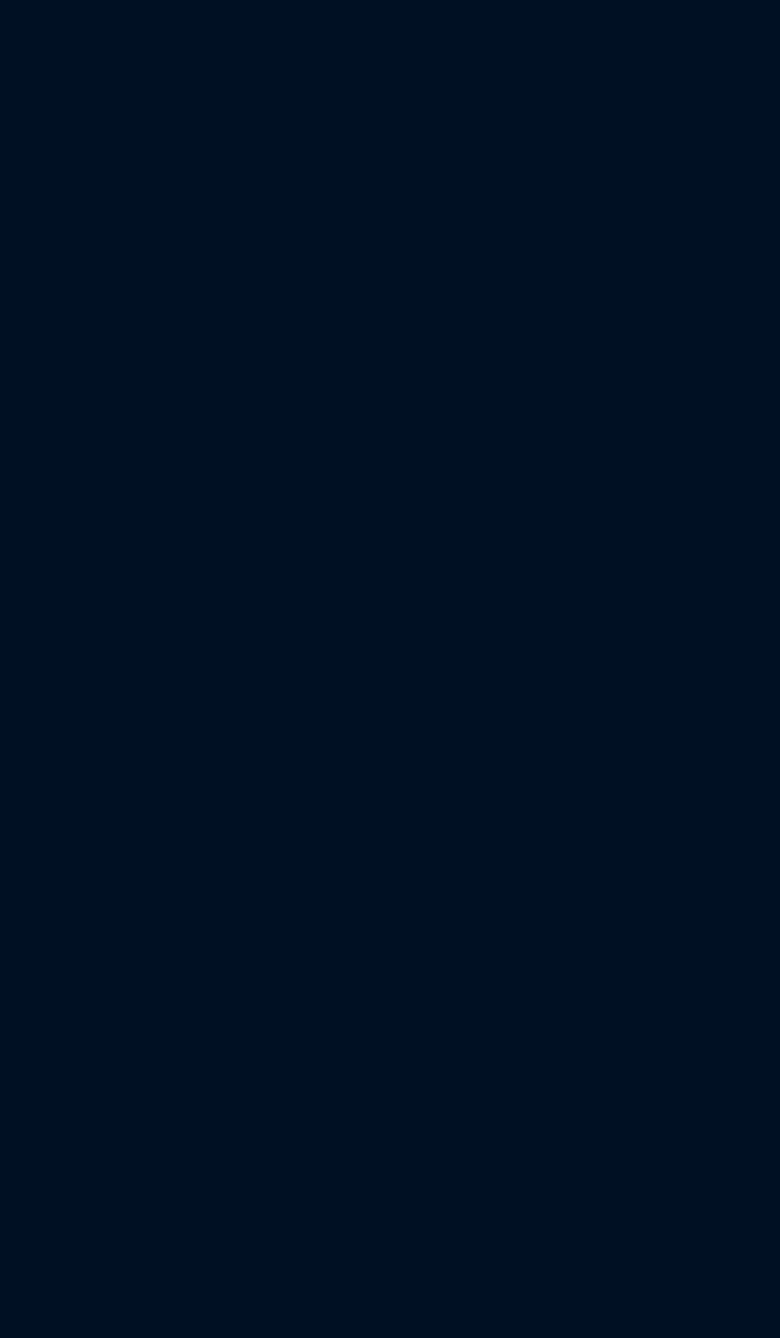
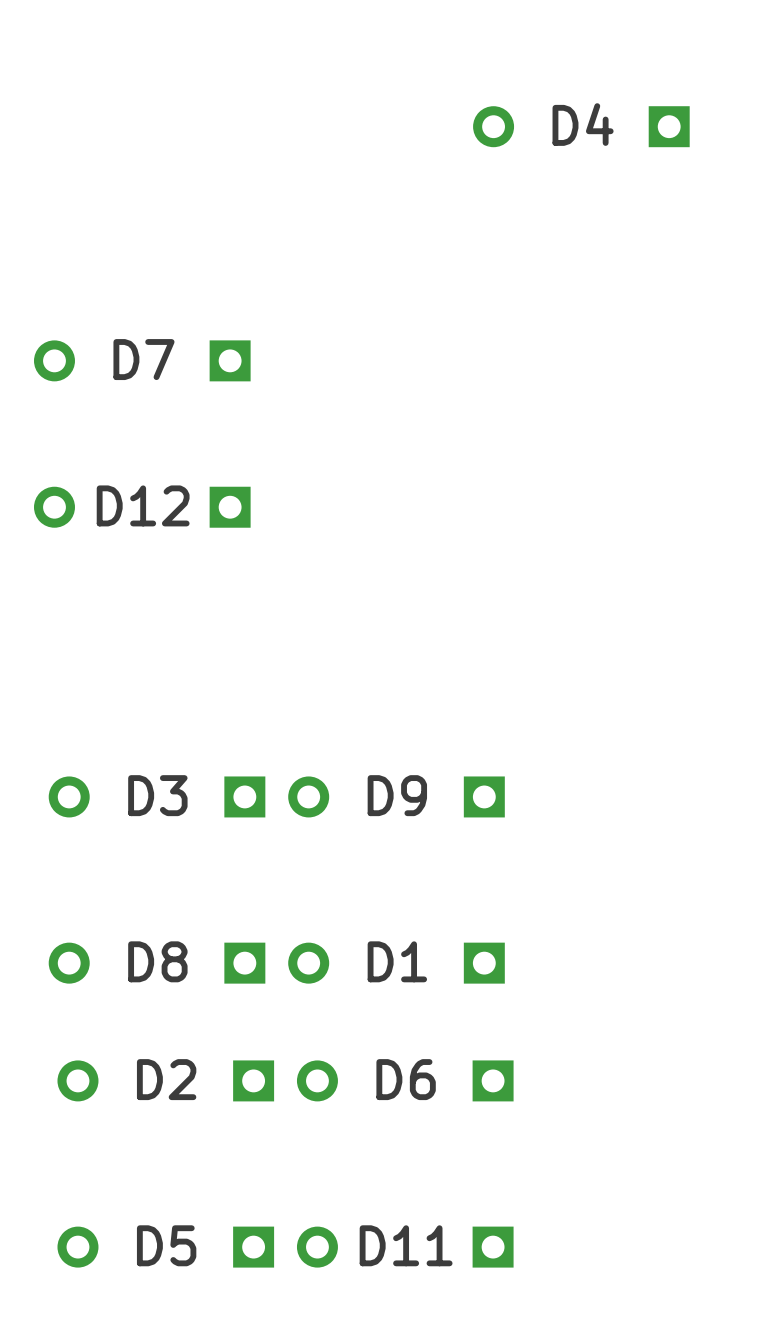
D4: none -> (581, 126)
D7: none -> (142, 360)
D12: none -> (142, 507)
D3: none -> (157, 796)
D9: none -> (396, 796)
D8: none -> (157, 963)
D1: none -> (396, 963)
D2: none -> (165, 1080)
D6: none -> (405, 1080)
D5: none -> (165, 1247)
D11: none -> (405, 1247)

